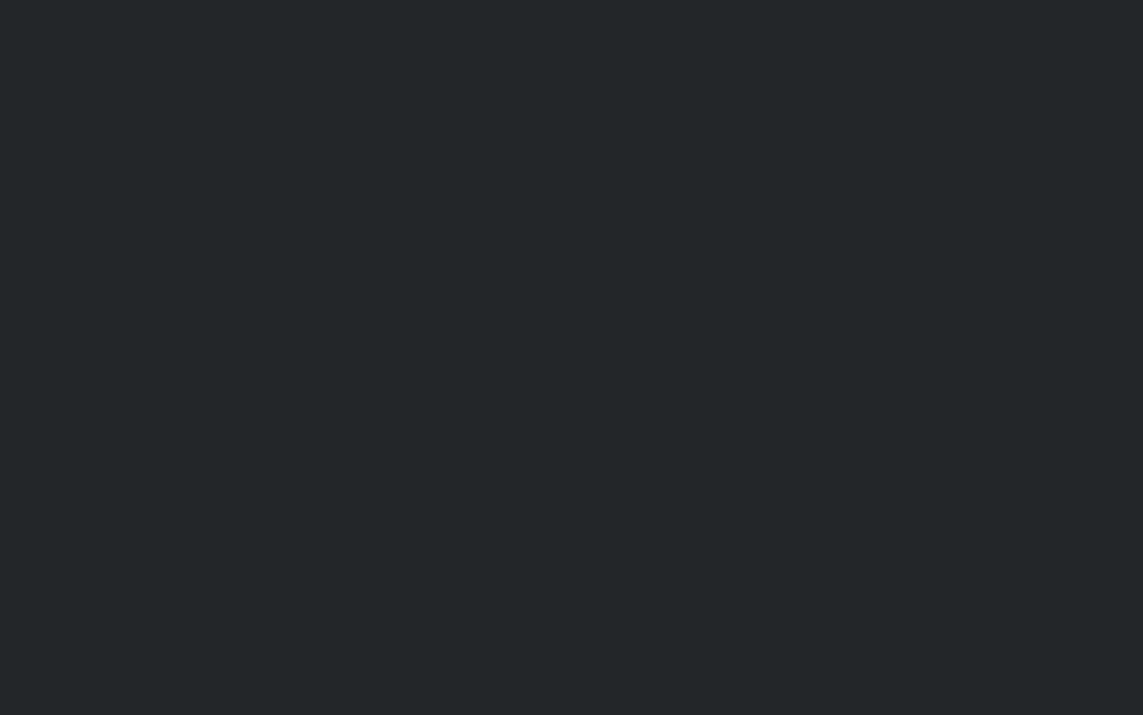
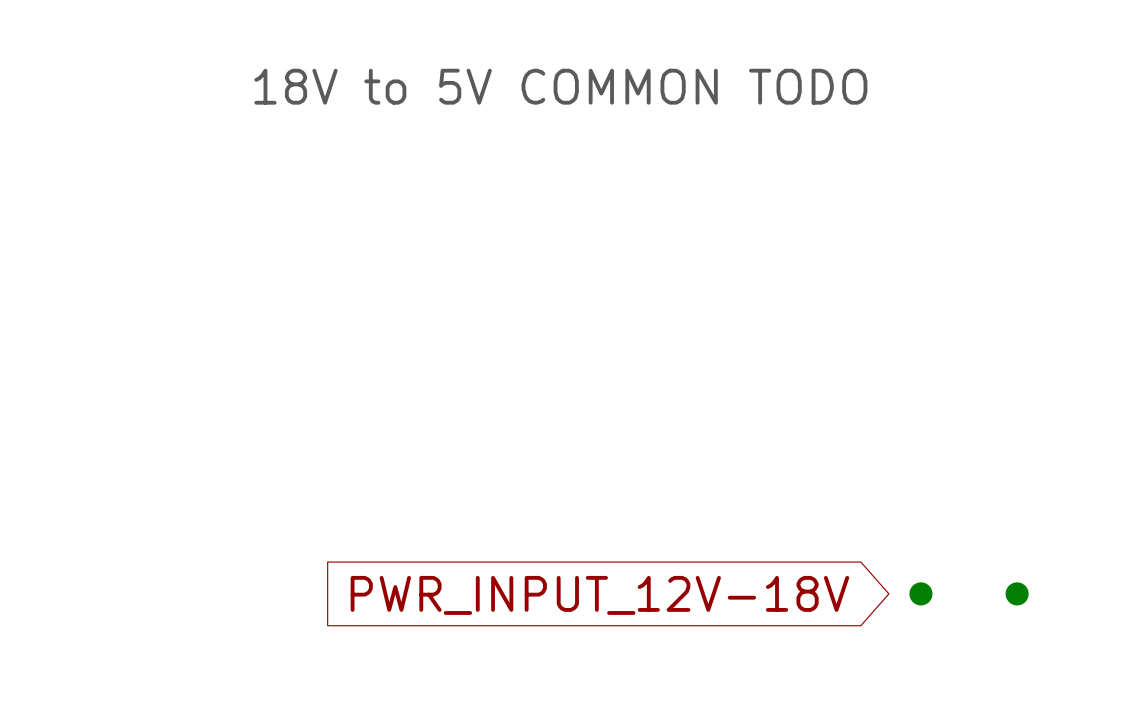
text: none -> 18V to 5V COMMON TODO (560, 86)
junction: none -> (920, 593)
junction: none -> (1017, 593)
global label: none -> PWR_INPUT_12V-18V (599, 595)

